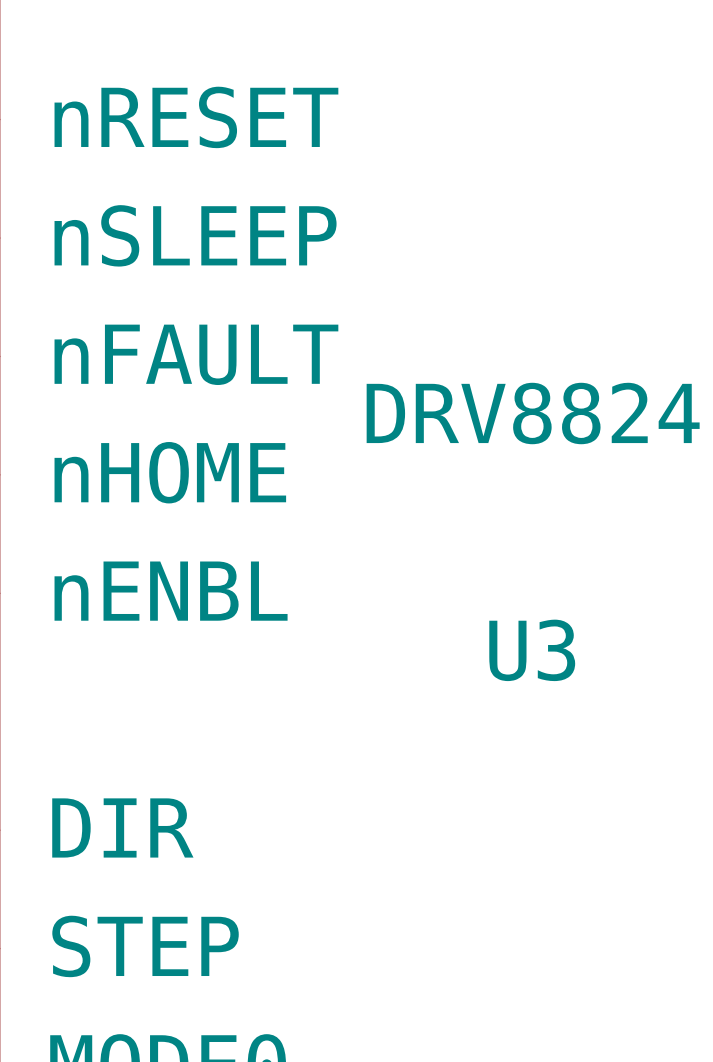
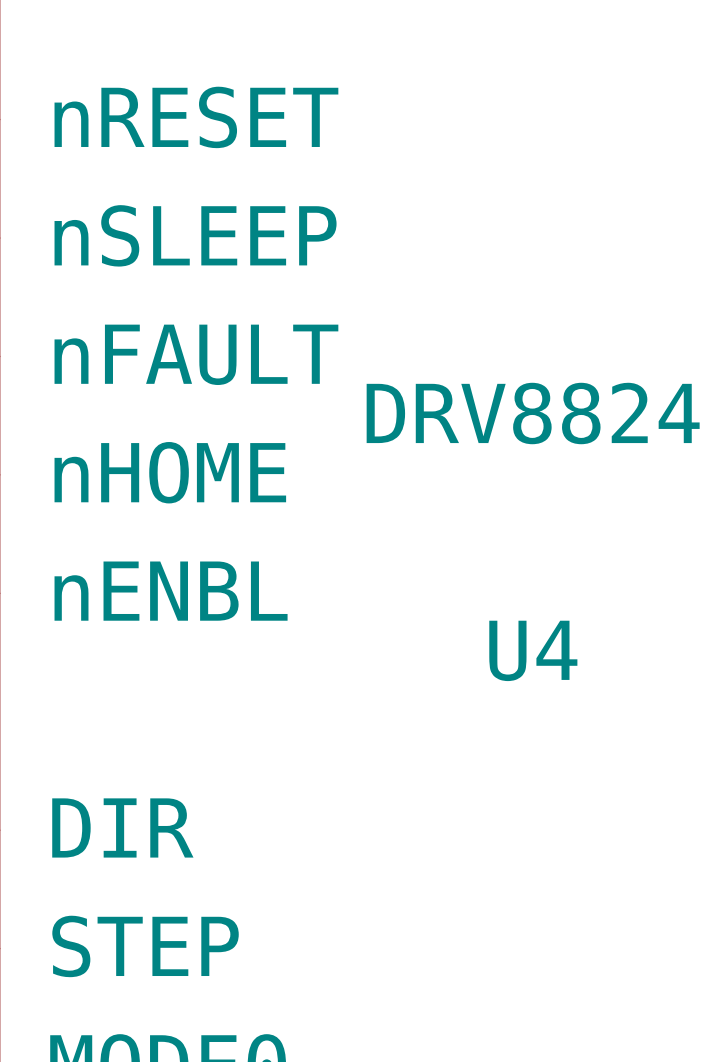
U3 name: U3 (532, 650) -> U4 (533, 650)

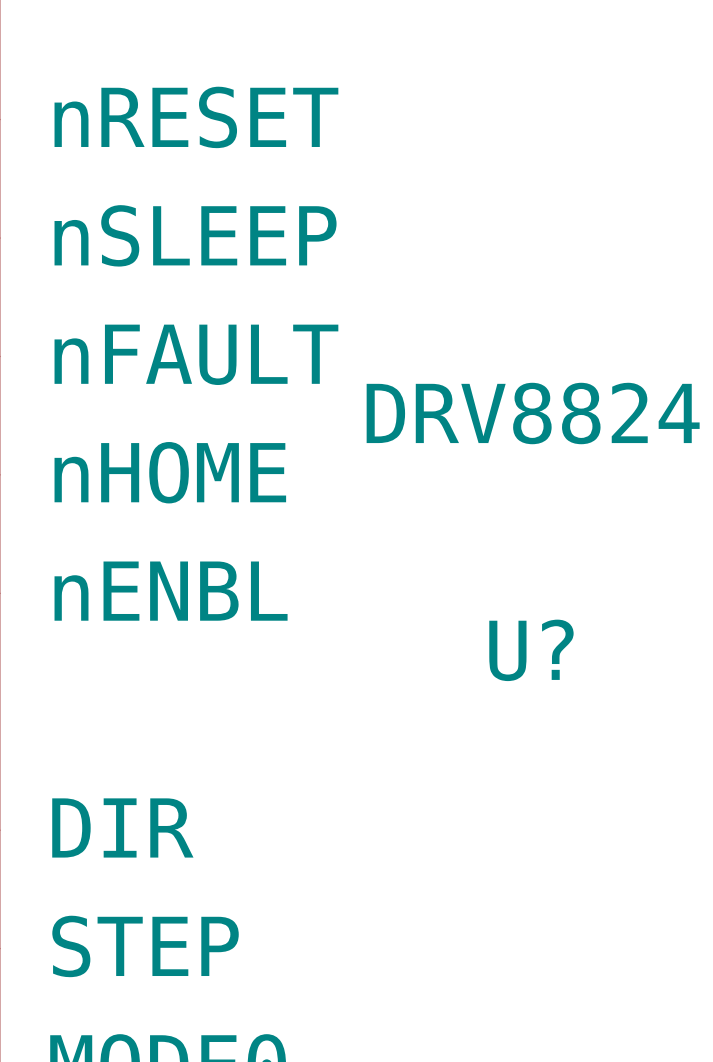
U4 name: U4 (533, 650) -> U? (531, 650)

